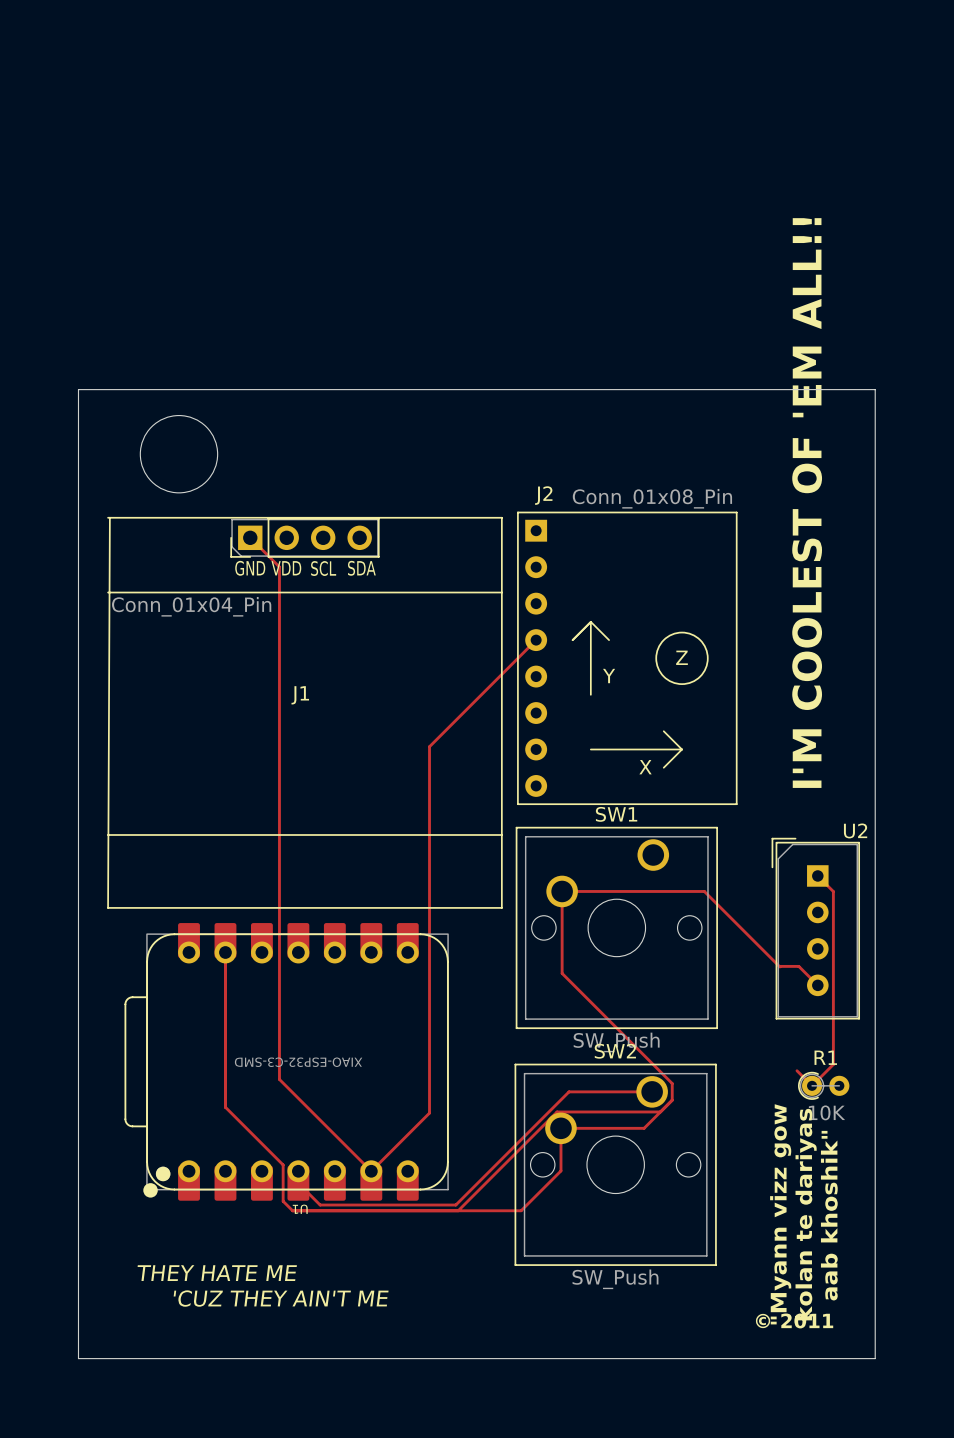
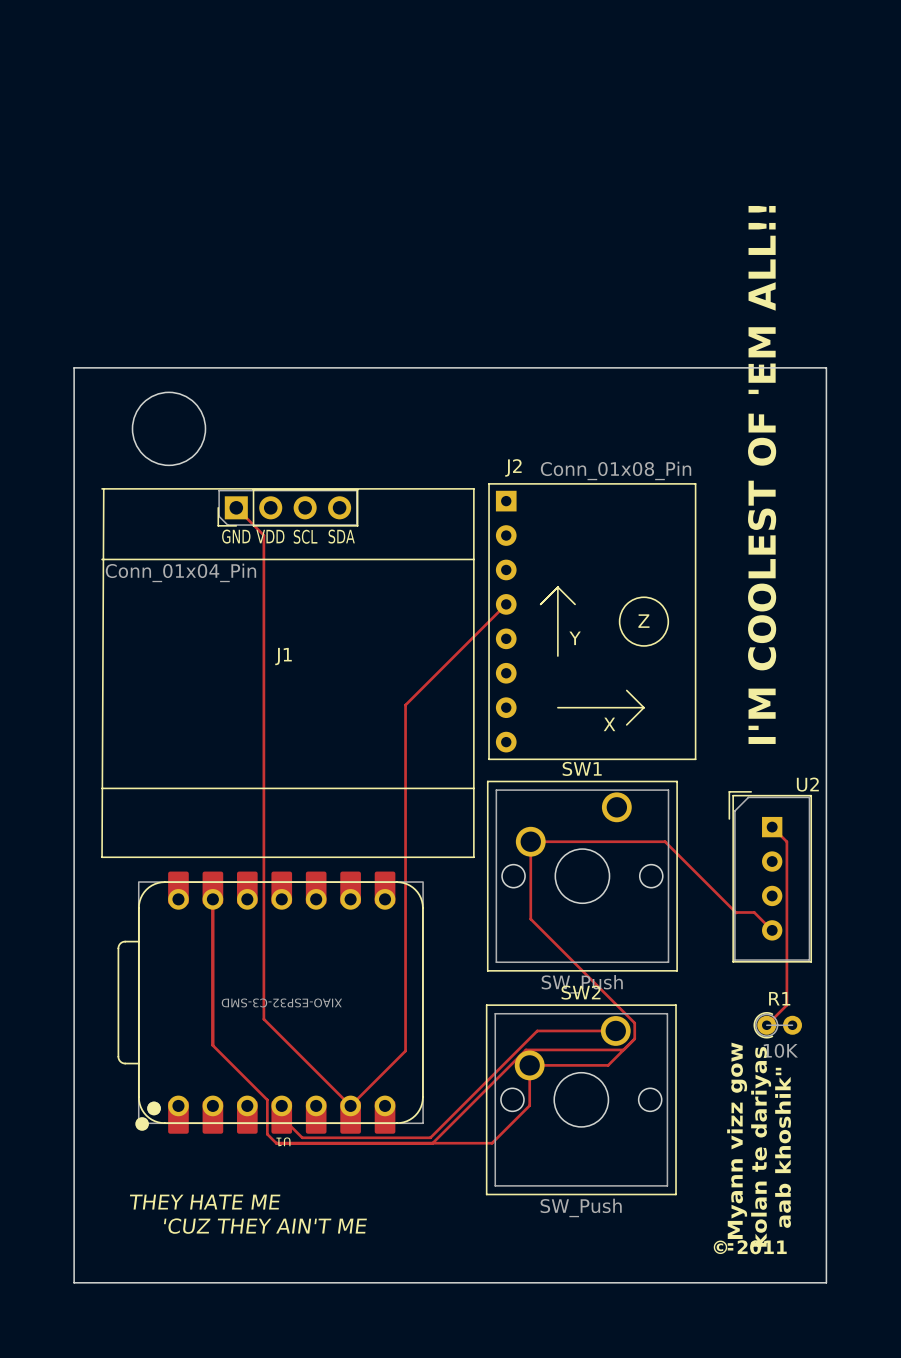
track: (796, 1070) (812, 1085) -> none

